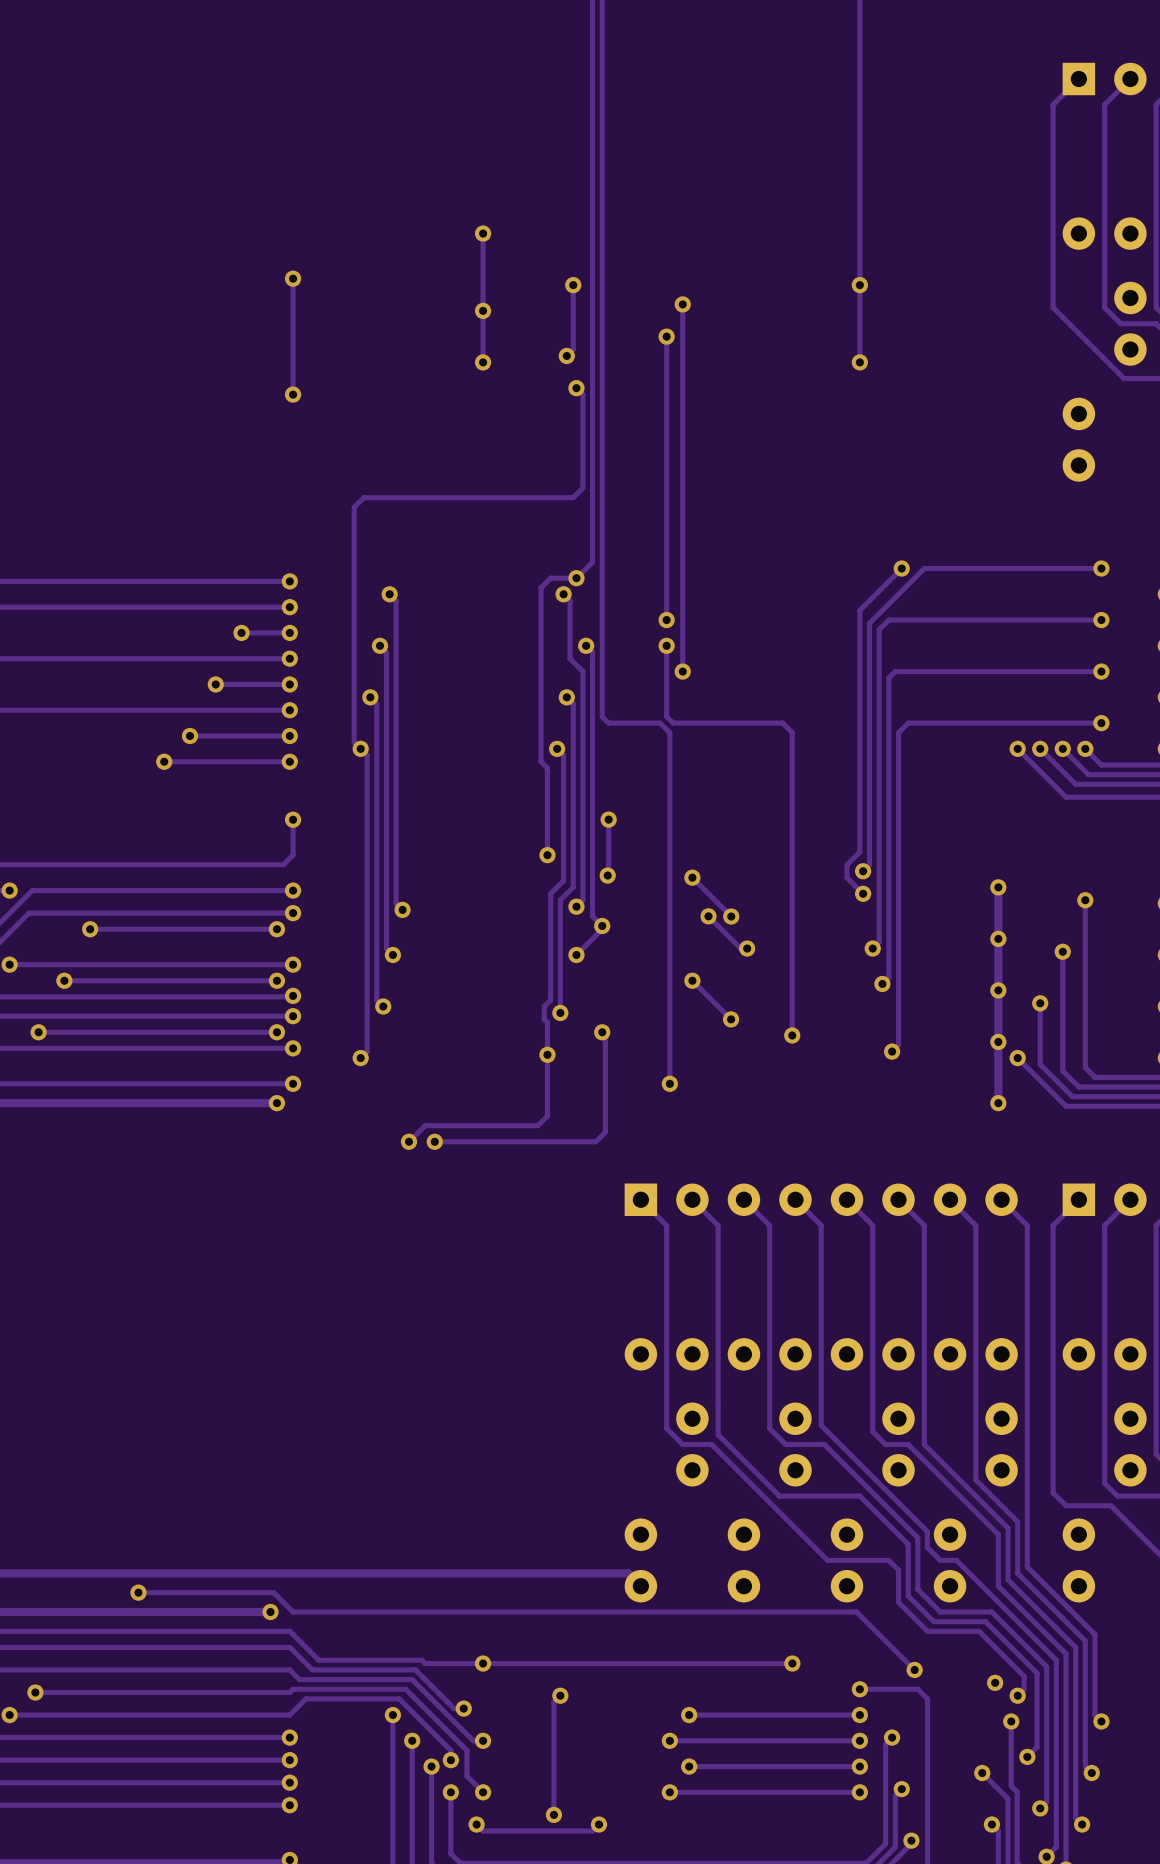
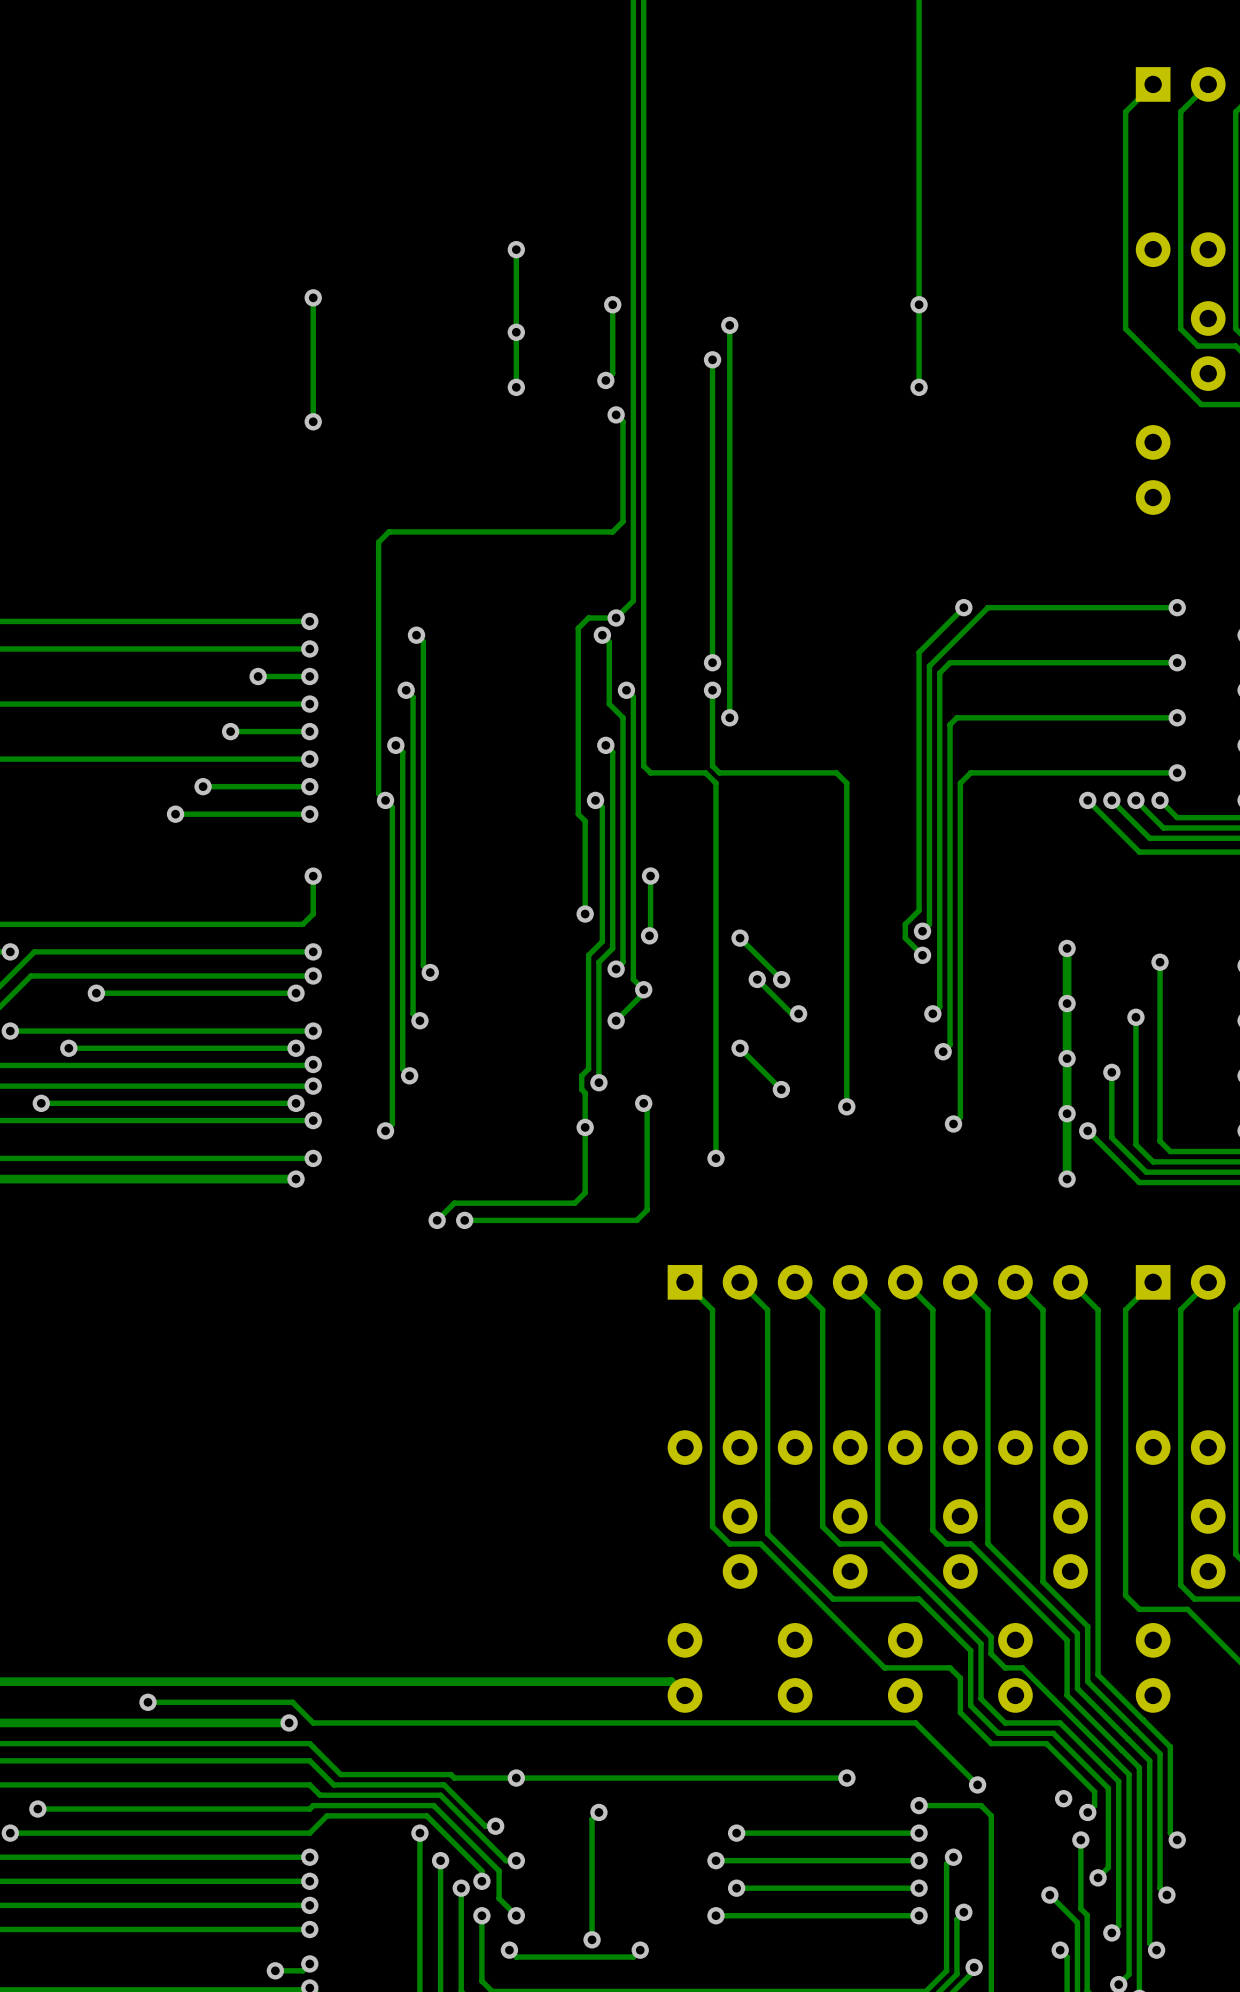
track: none -> (309, 1963) (302, 1970) (275, 1970)
via: none -> (309, 1963)
via: none -> (275, 1970)

